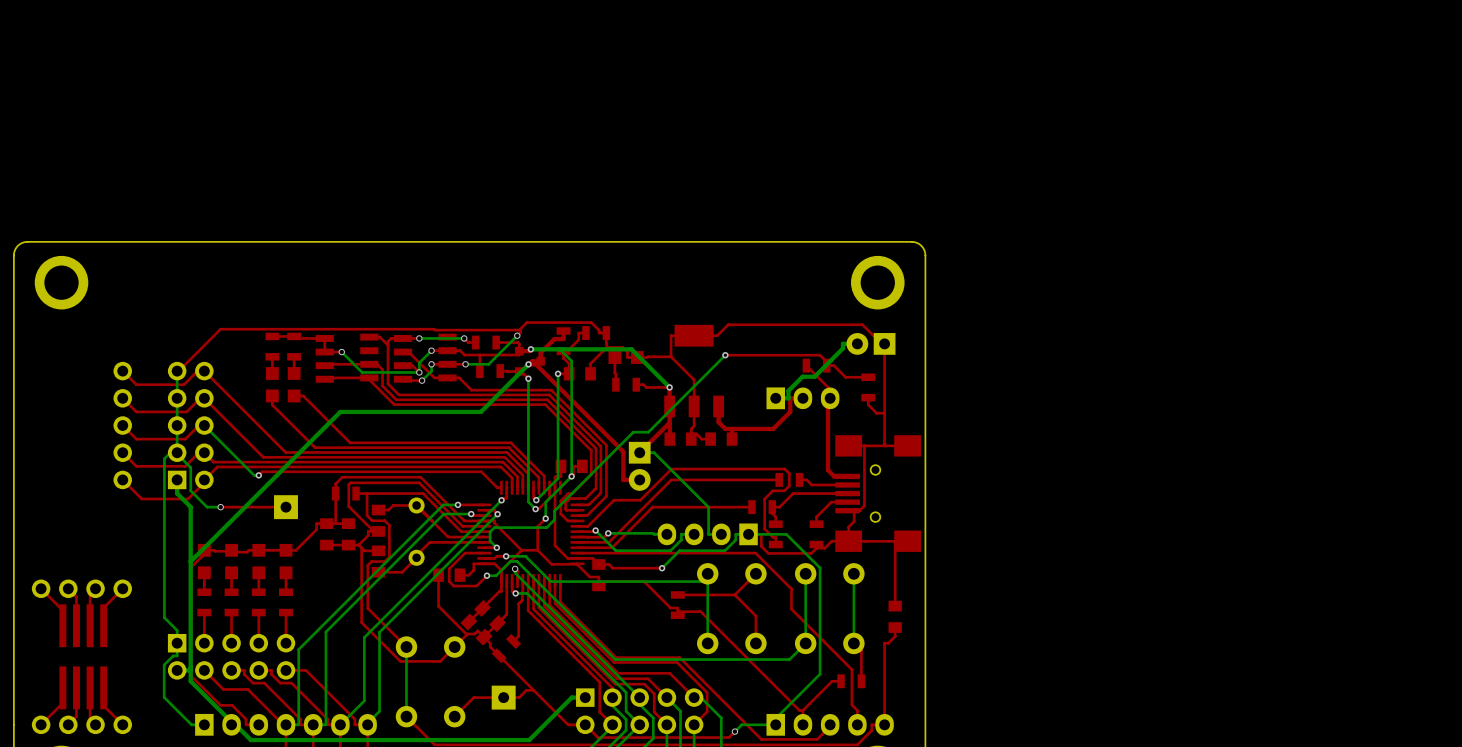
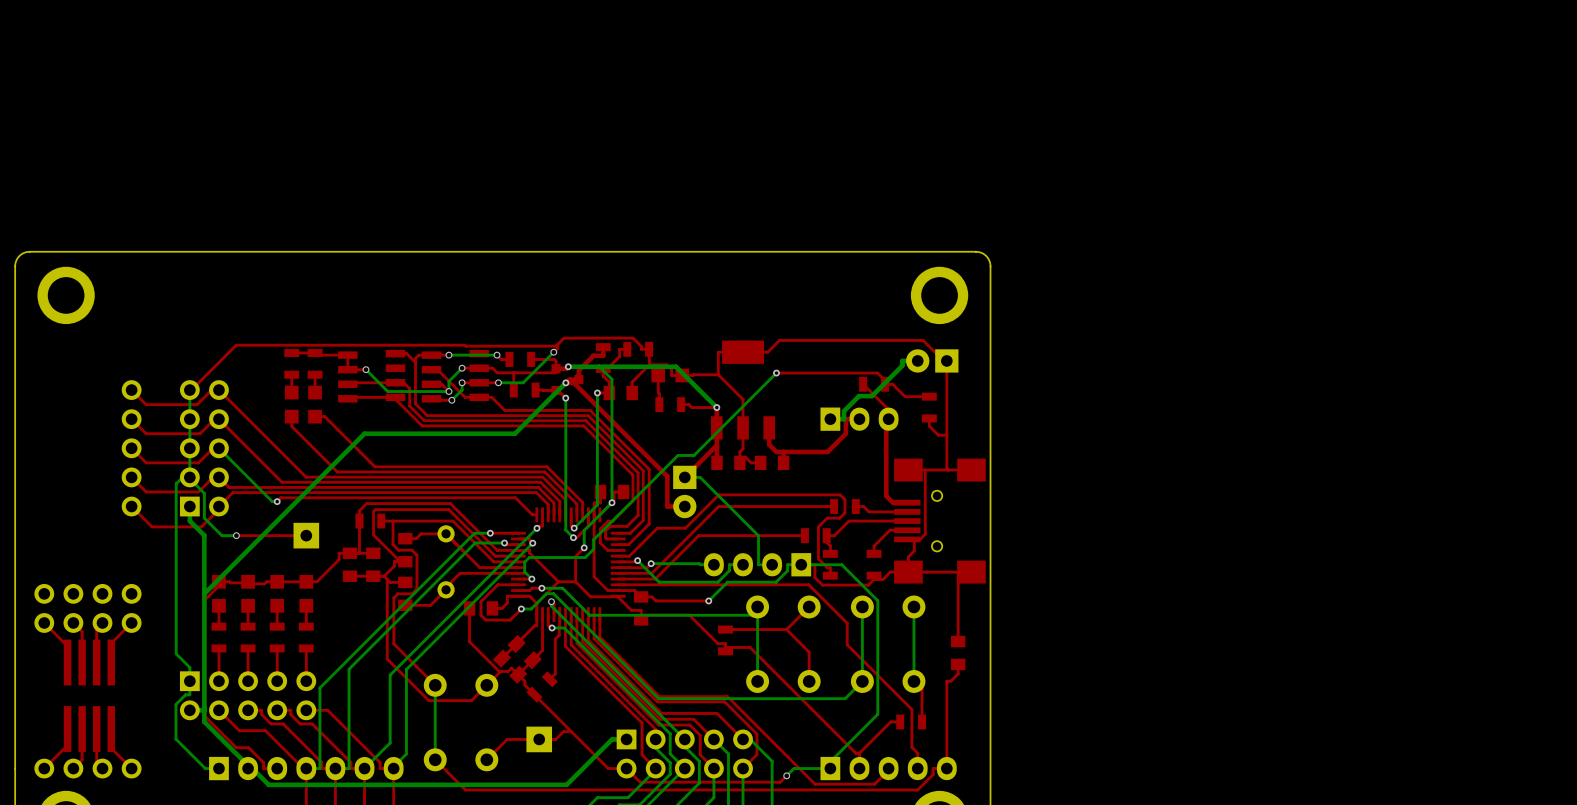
part: none -> (44, 593)
part: none -> (73, 593)
part: none -> (102, 593)
part: none -> (131, 593)

